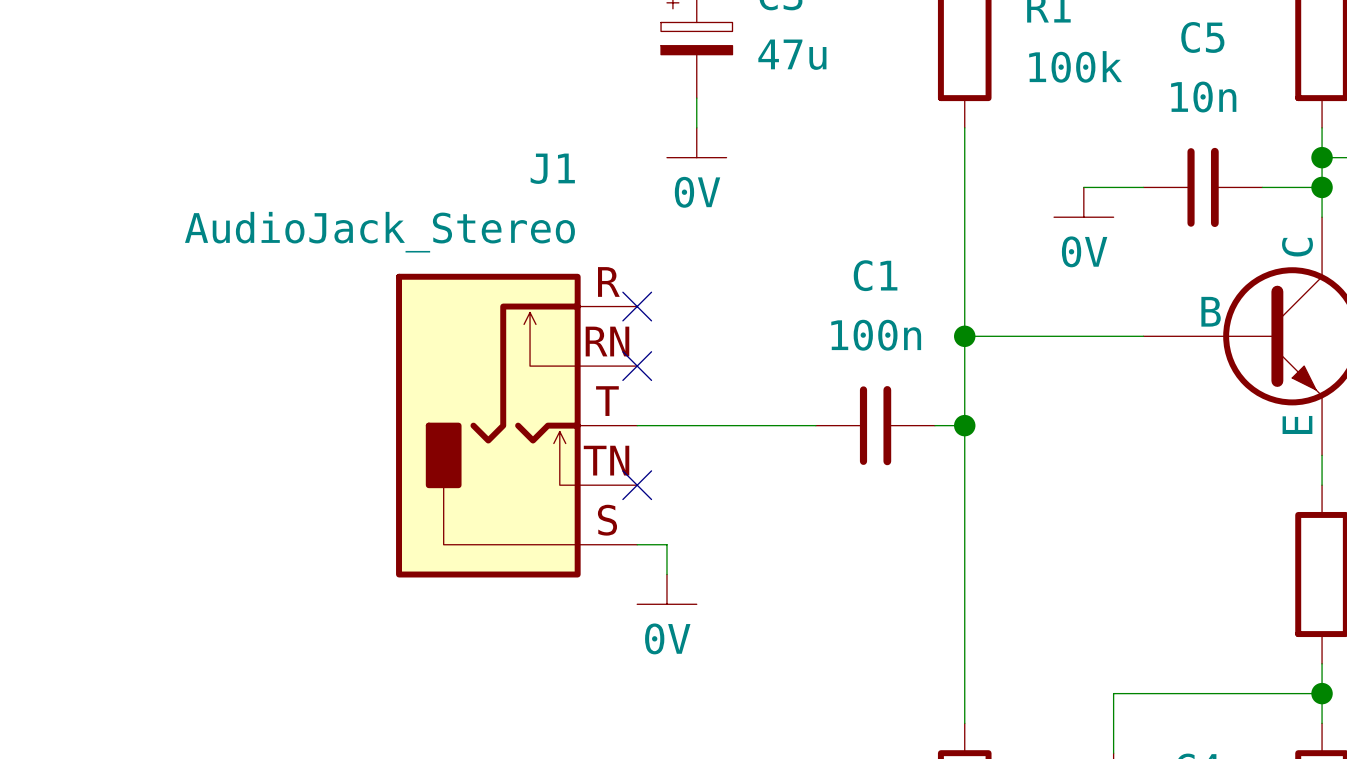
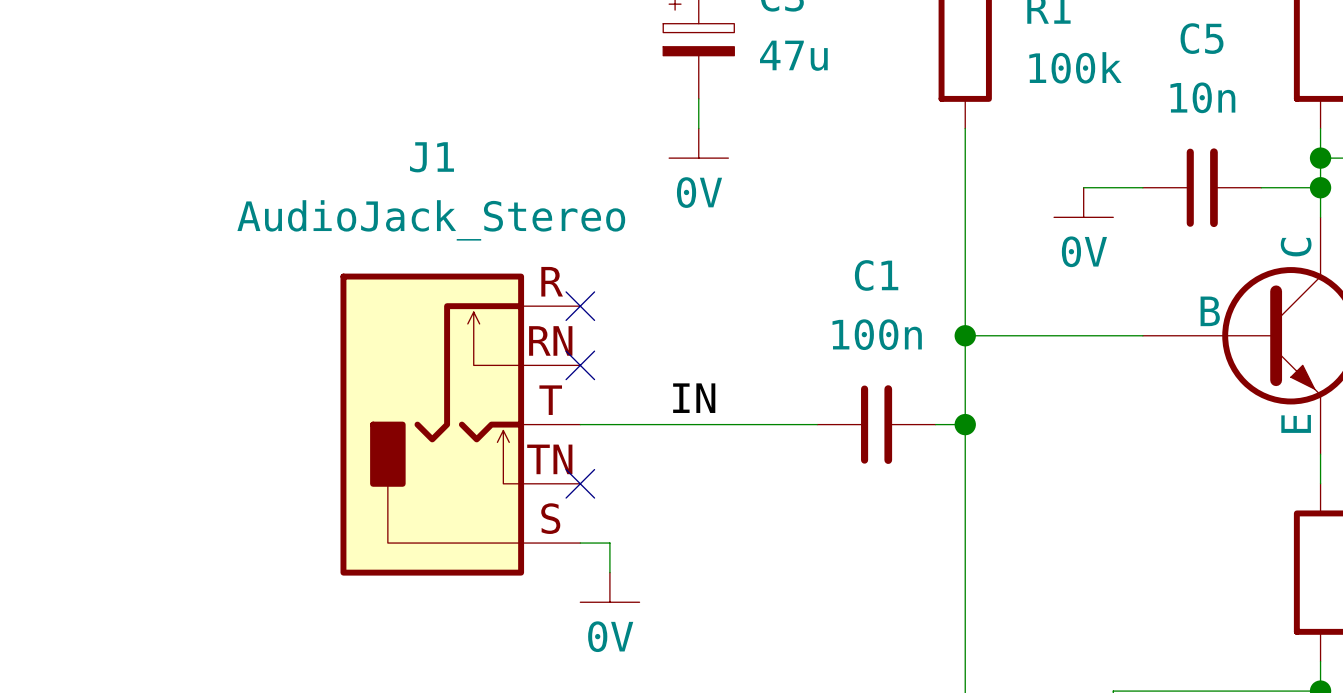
J1 name position: J1 (552, 168) -> J1 (431, 157)
J1 value position: AudioJack_Stereo (379, 232) -> AudioJack_Stereo (431, 220)
no-connect mark: none -> (580, 306)
no-connect mark: (637, 306) -> none
no-connect mark: none -> (580, 365)
no-connect mark: (637, 366) -> none
label: none -> IN (694, 398)
J1 position: (516, 425) -> (460, 424)
no-connect mark position: (637, 485) -> (580, 483)
wire: (637, 544) (666, 544) (666, 574) -> (580, 543) (609, 543) (609, 572)
power symbol position: 0V (666, 589) -> 0V (609, 587)

